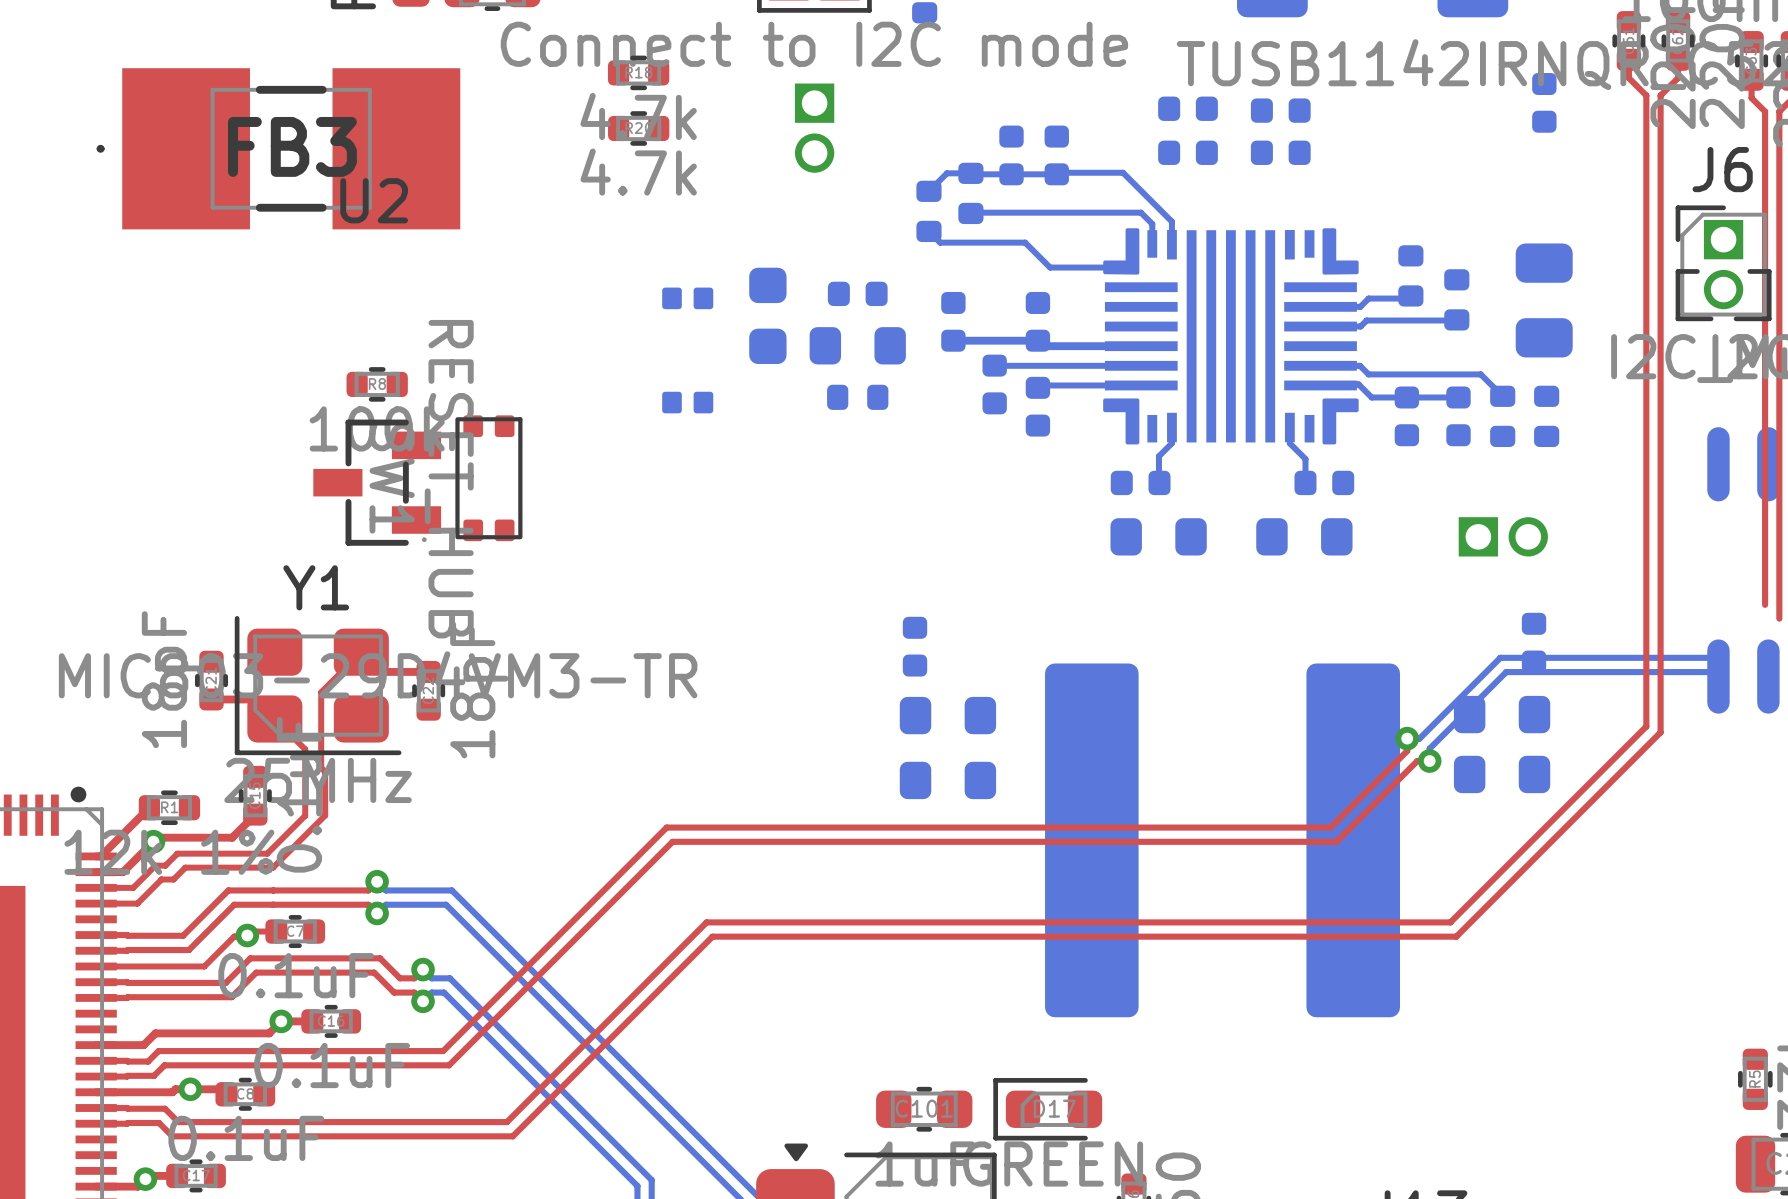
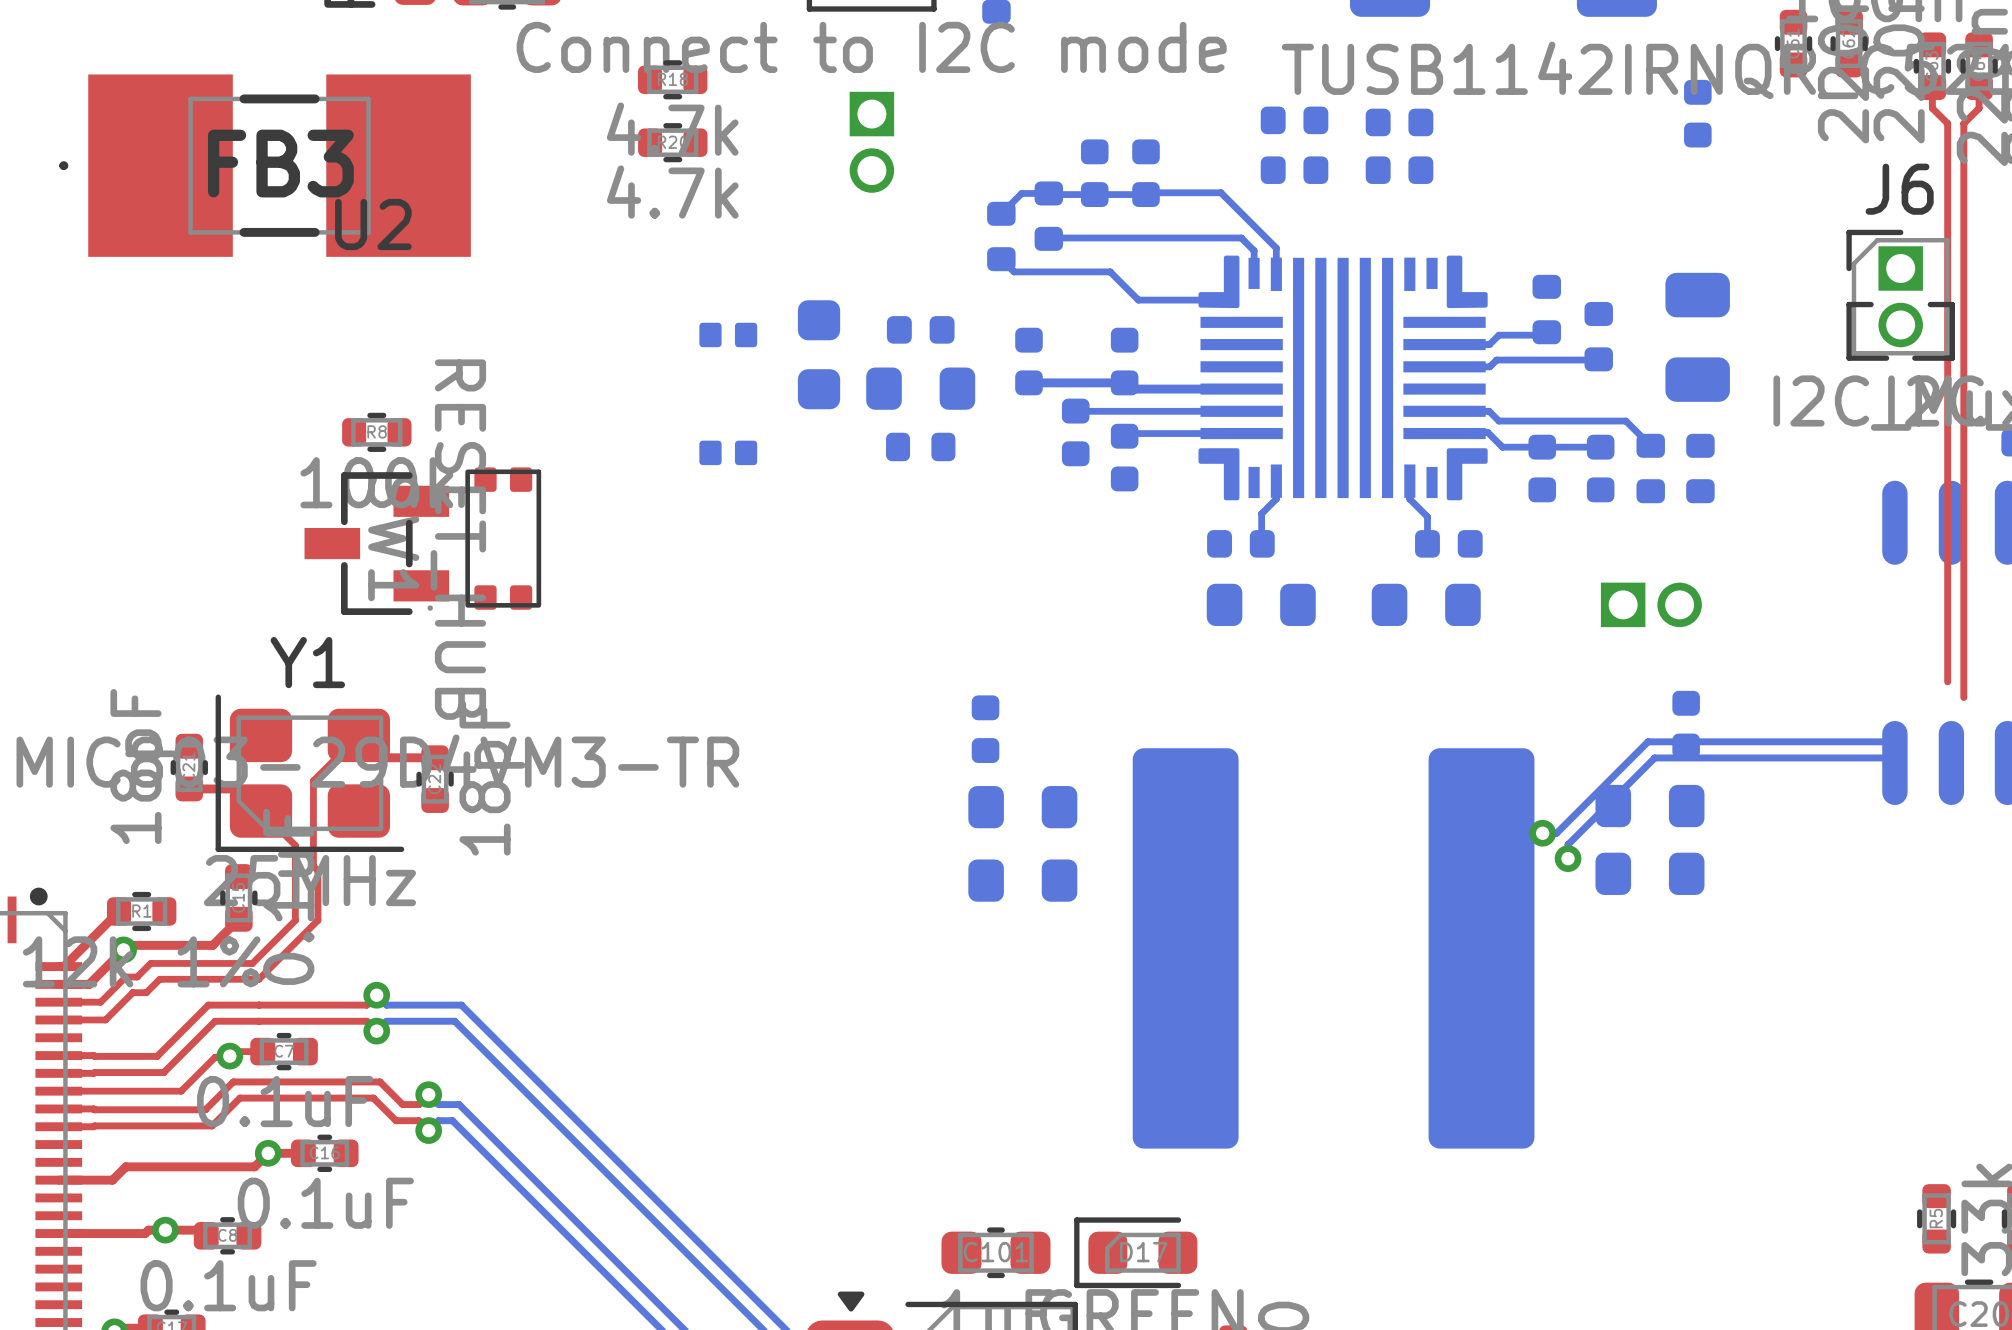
top track: (1628, 59) (1628, 78) (1646, 95) (1646, 726) (1450, 922) (706, 922) (506, 1122) (178, 1122) (165, 1108) (96, 1108) -> none
top track: (1678, 59) (1678, 78) (1660, 95) (1660, 732) (1456, 936) (712, 936) (512, 1136) (172, 1136) (159, 1122) (96, 1123) -> none
top track: (1407, 738) (1407, 750) (1330, 827) (666, 827) (443, 1051) (158, 1051) (148, 1061) (96, 1060) -> none
top track: (1429, 761) (1417, 761) (1336, 841) (672, 841) (449, 1065) (164, 1065) (154, 1075) (96, 1076) -> none

